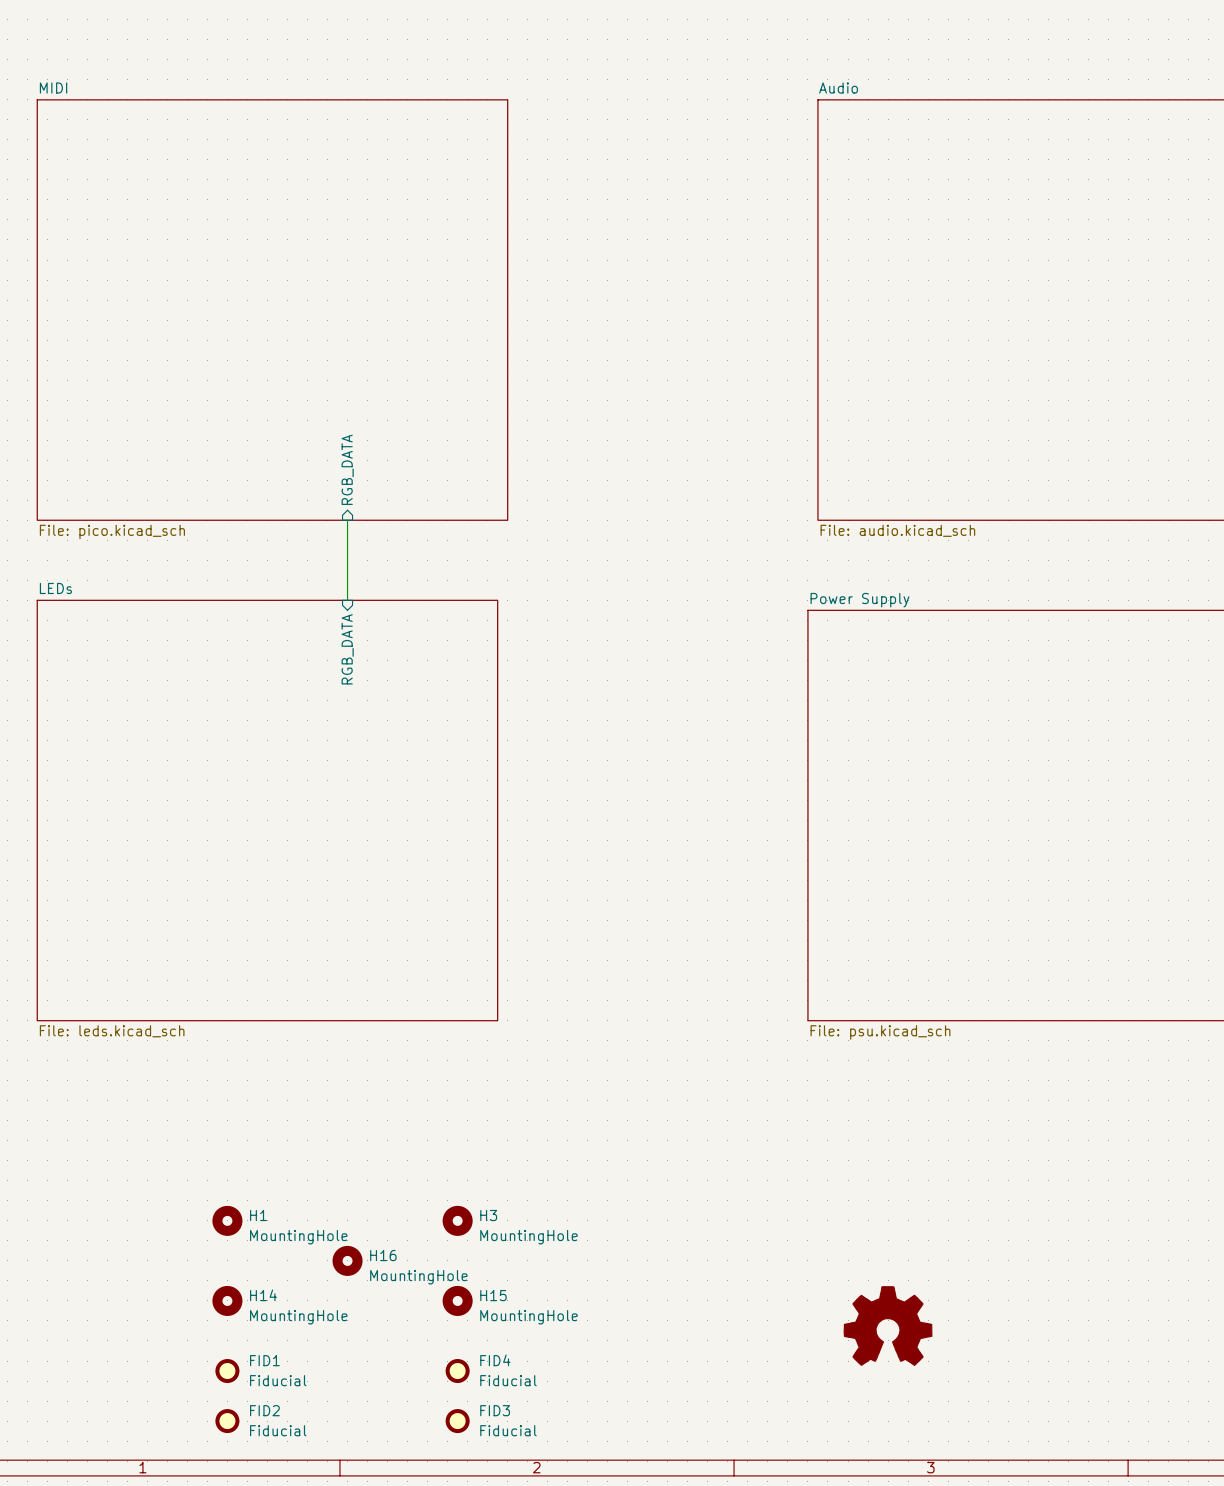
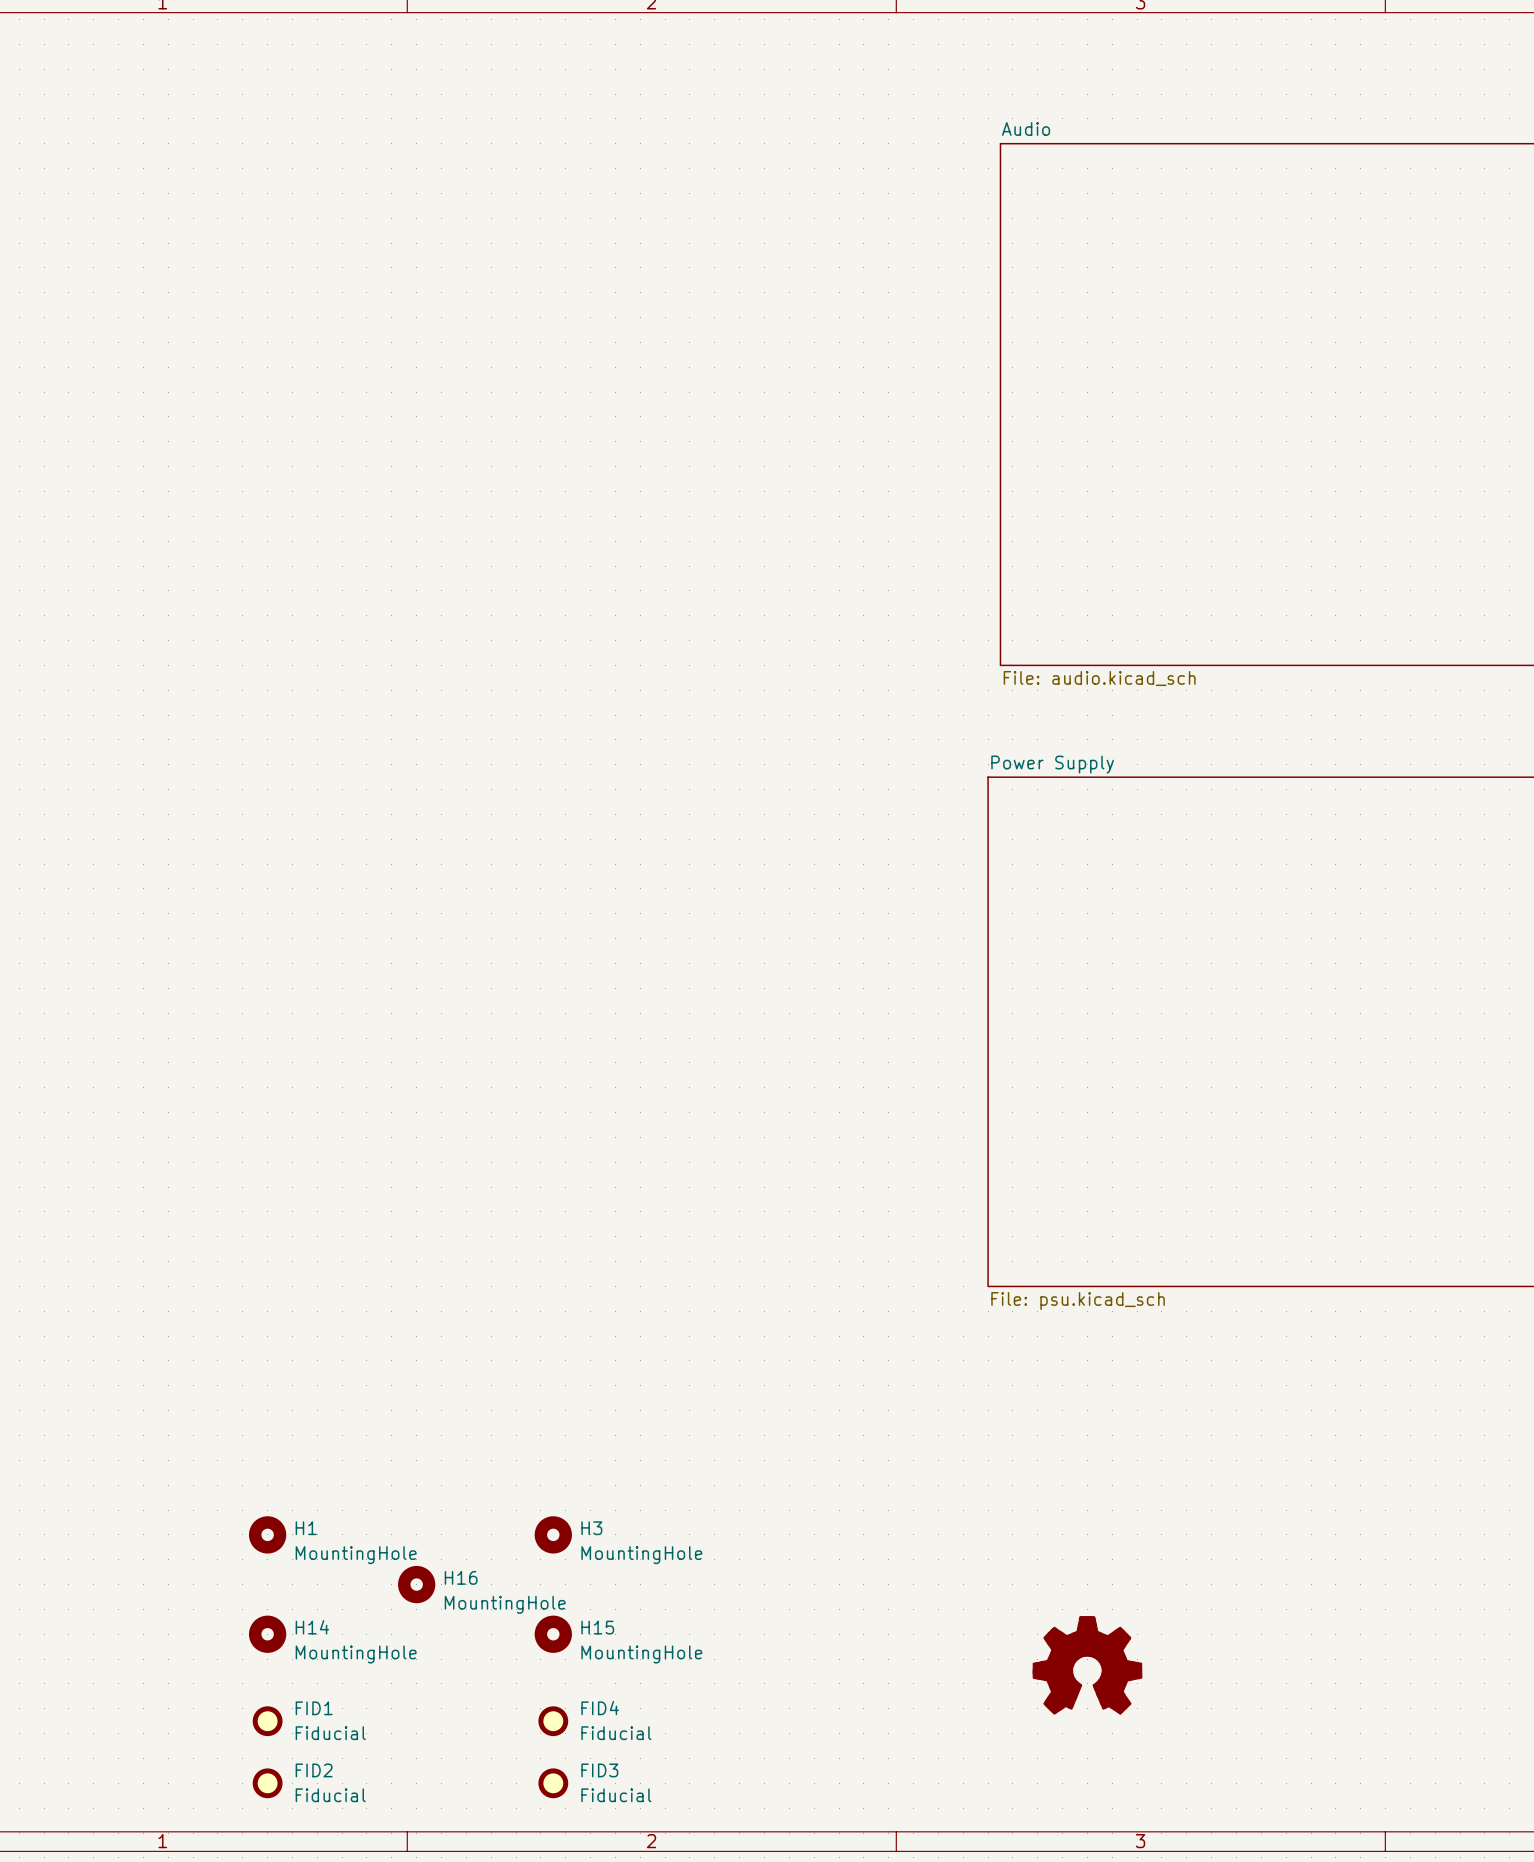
sheet MIDI: File: pico.kicad_sch (272, 310) -> none
sheet pin: RGB_DATA (347, 469) -> none
wire: (347, 520) (347, 600) -> none
sheet pin: RGB_DATA (347, 649) -> none
sheet LEDs: File: leds.kicad_sch (267, 810) -> none

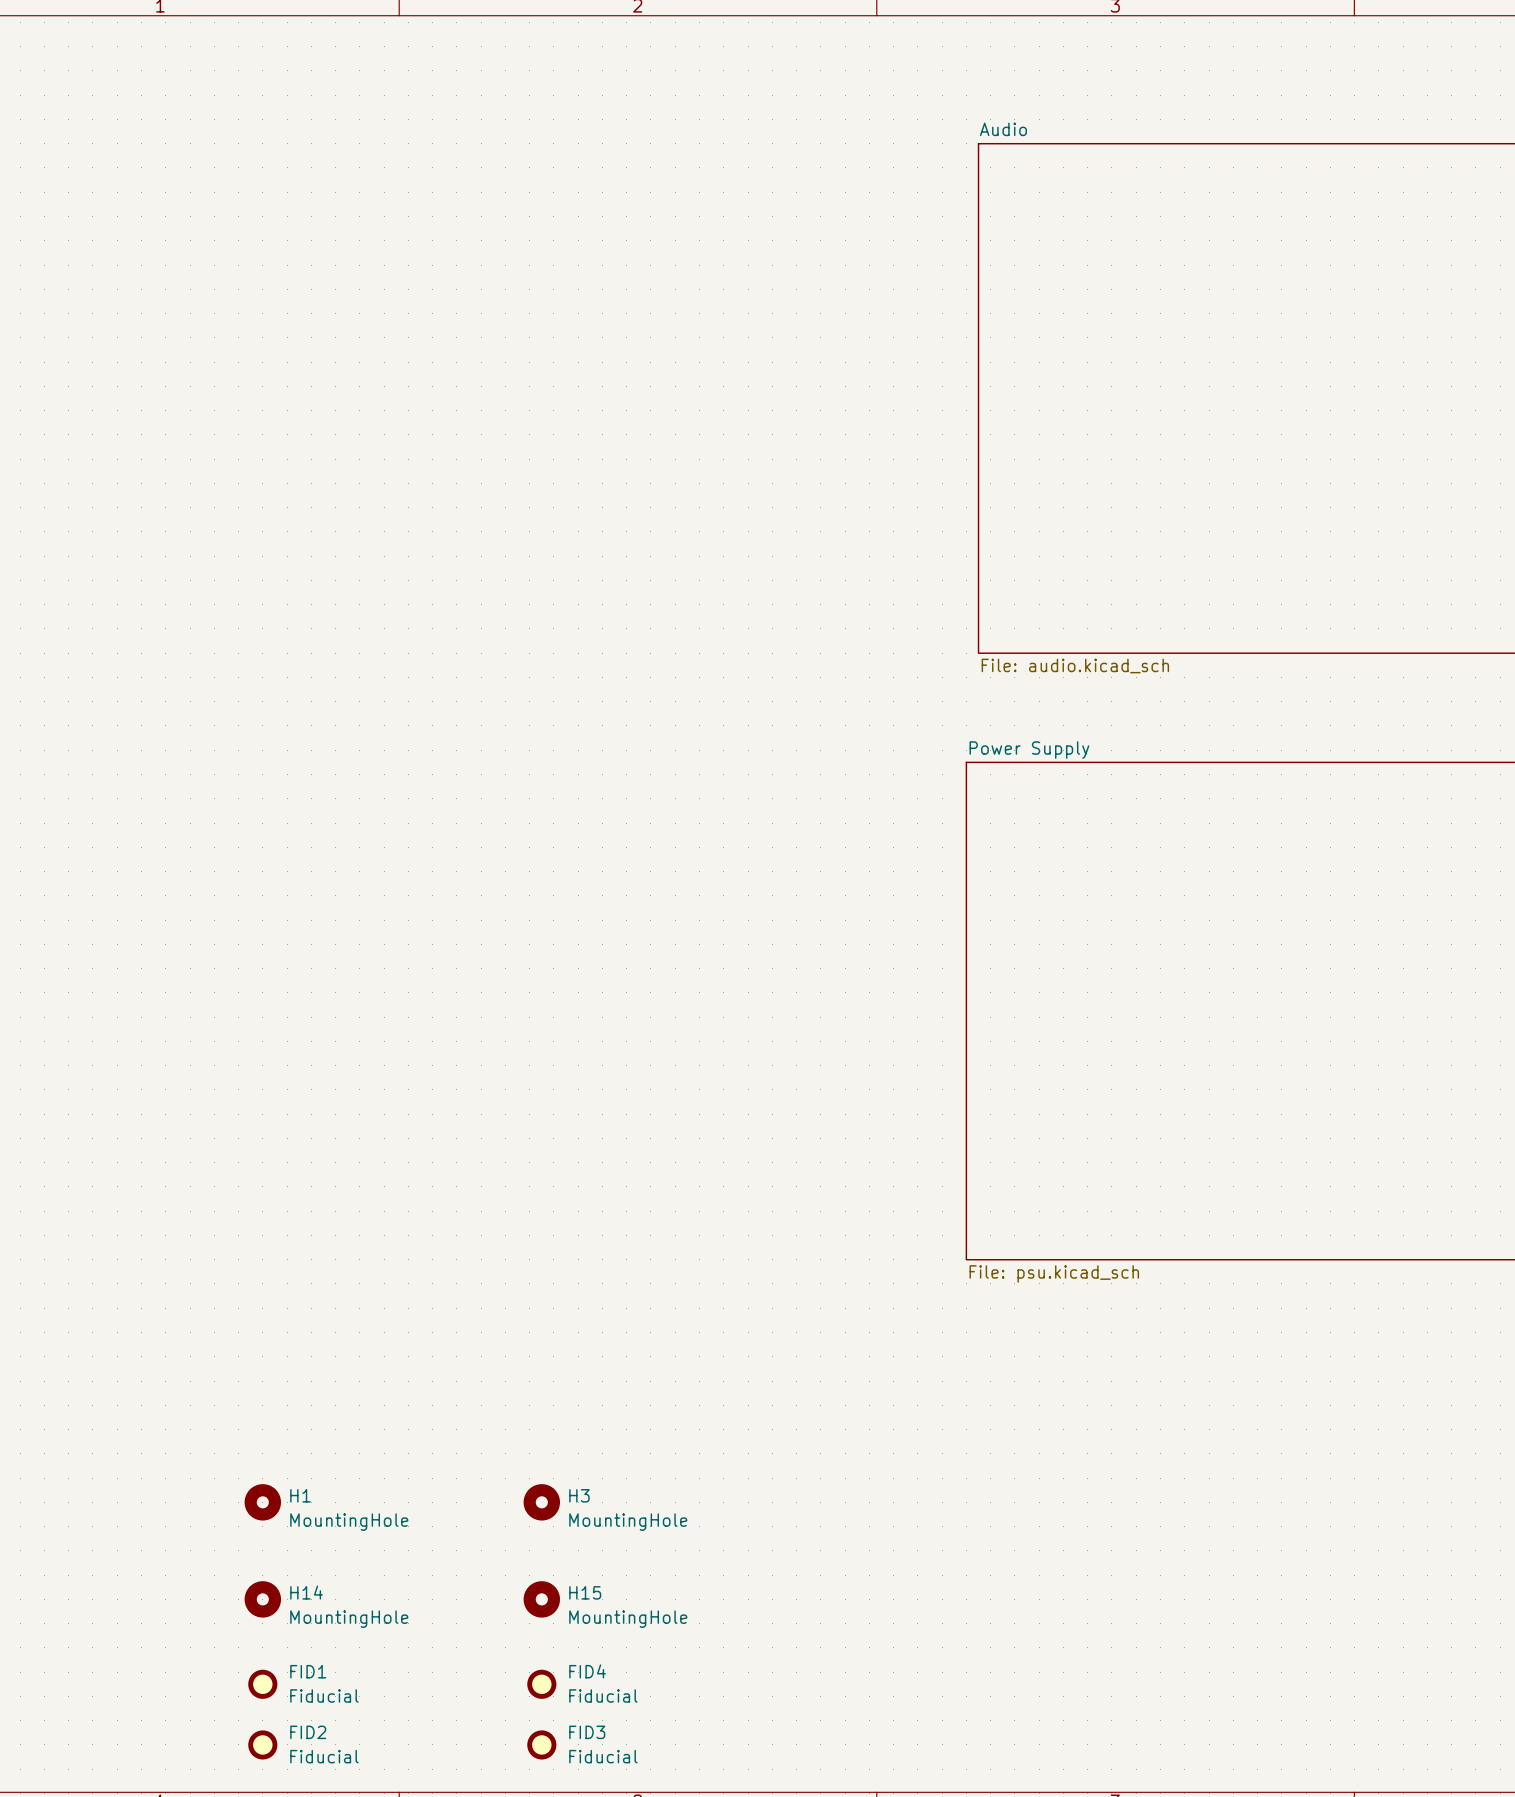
H16: MountingHole (416, 1584) -> none
part: (1087, 1665) -> none

